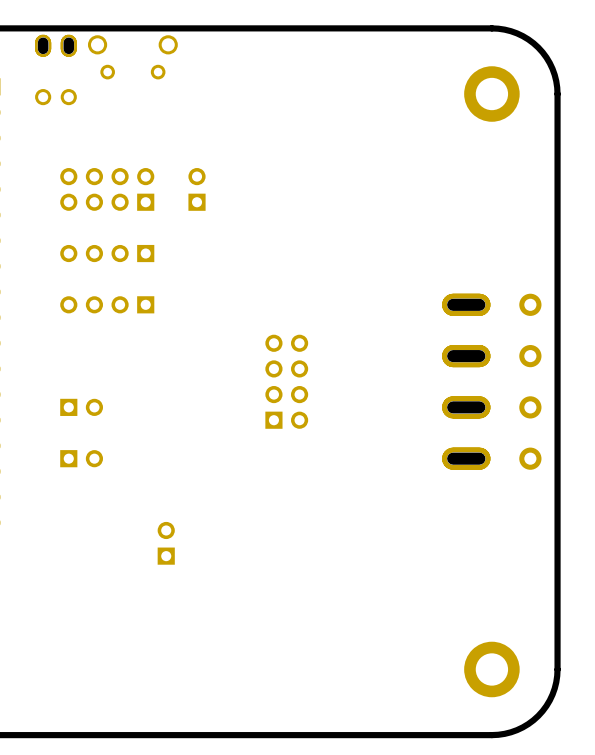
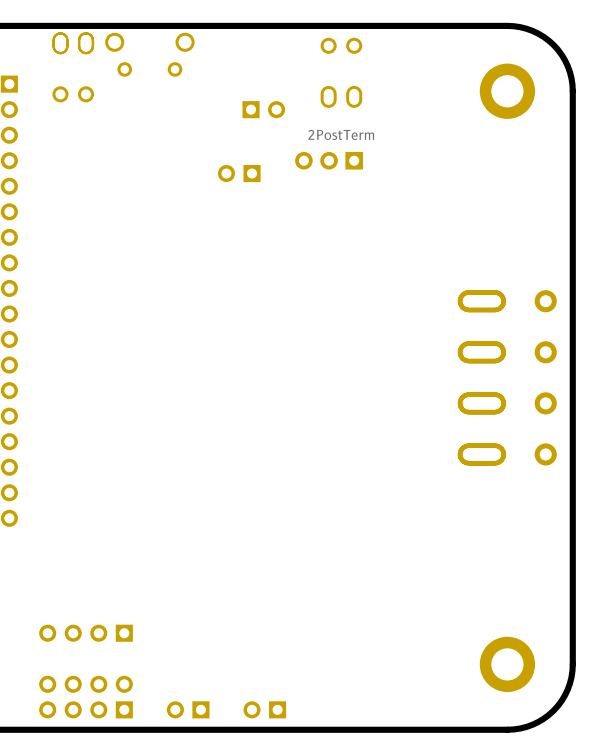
board edge: (43, 42) (43, 48) -> none
board edge: (68, 42) (68, 48) -> none
part: none -> 2PostTerm (341, 72)
part: none -> (263, 109)
part: none -> (329, 160)
part: (107, 189) -> none
part rotation: 0° (197, 189) -> 90° counterclockwise (239, 173)
part position: (197, 189) -> (239, 173)
part: (107, 253) -> none
part: (107, 304) -> none
board edge: (479, 304) (453, 304) -> none
board edge: (479, 356) (453, 356) -> none
part: (286, 381) -> none
part: (81, 407) -> none
board edge: (479, 407) (453, 407) -> none
part: (81, 458) -> none
board edge: (479, 458) (453, 458) -> none
part: (166, 543) -> none
part: none -> (86, 633)
part: none -> (86, 697)
part: none -> (188, 709)
part: none -> (264, 709)

